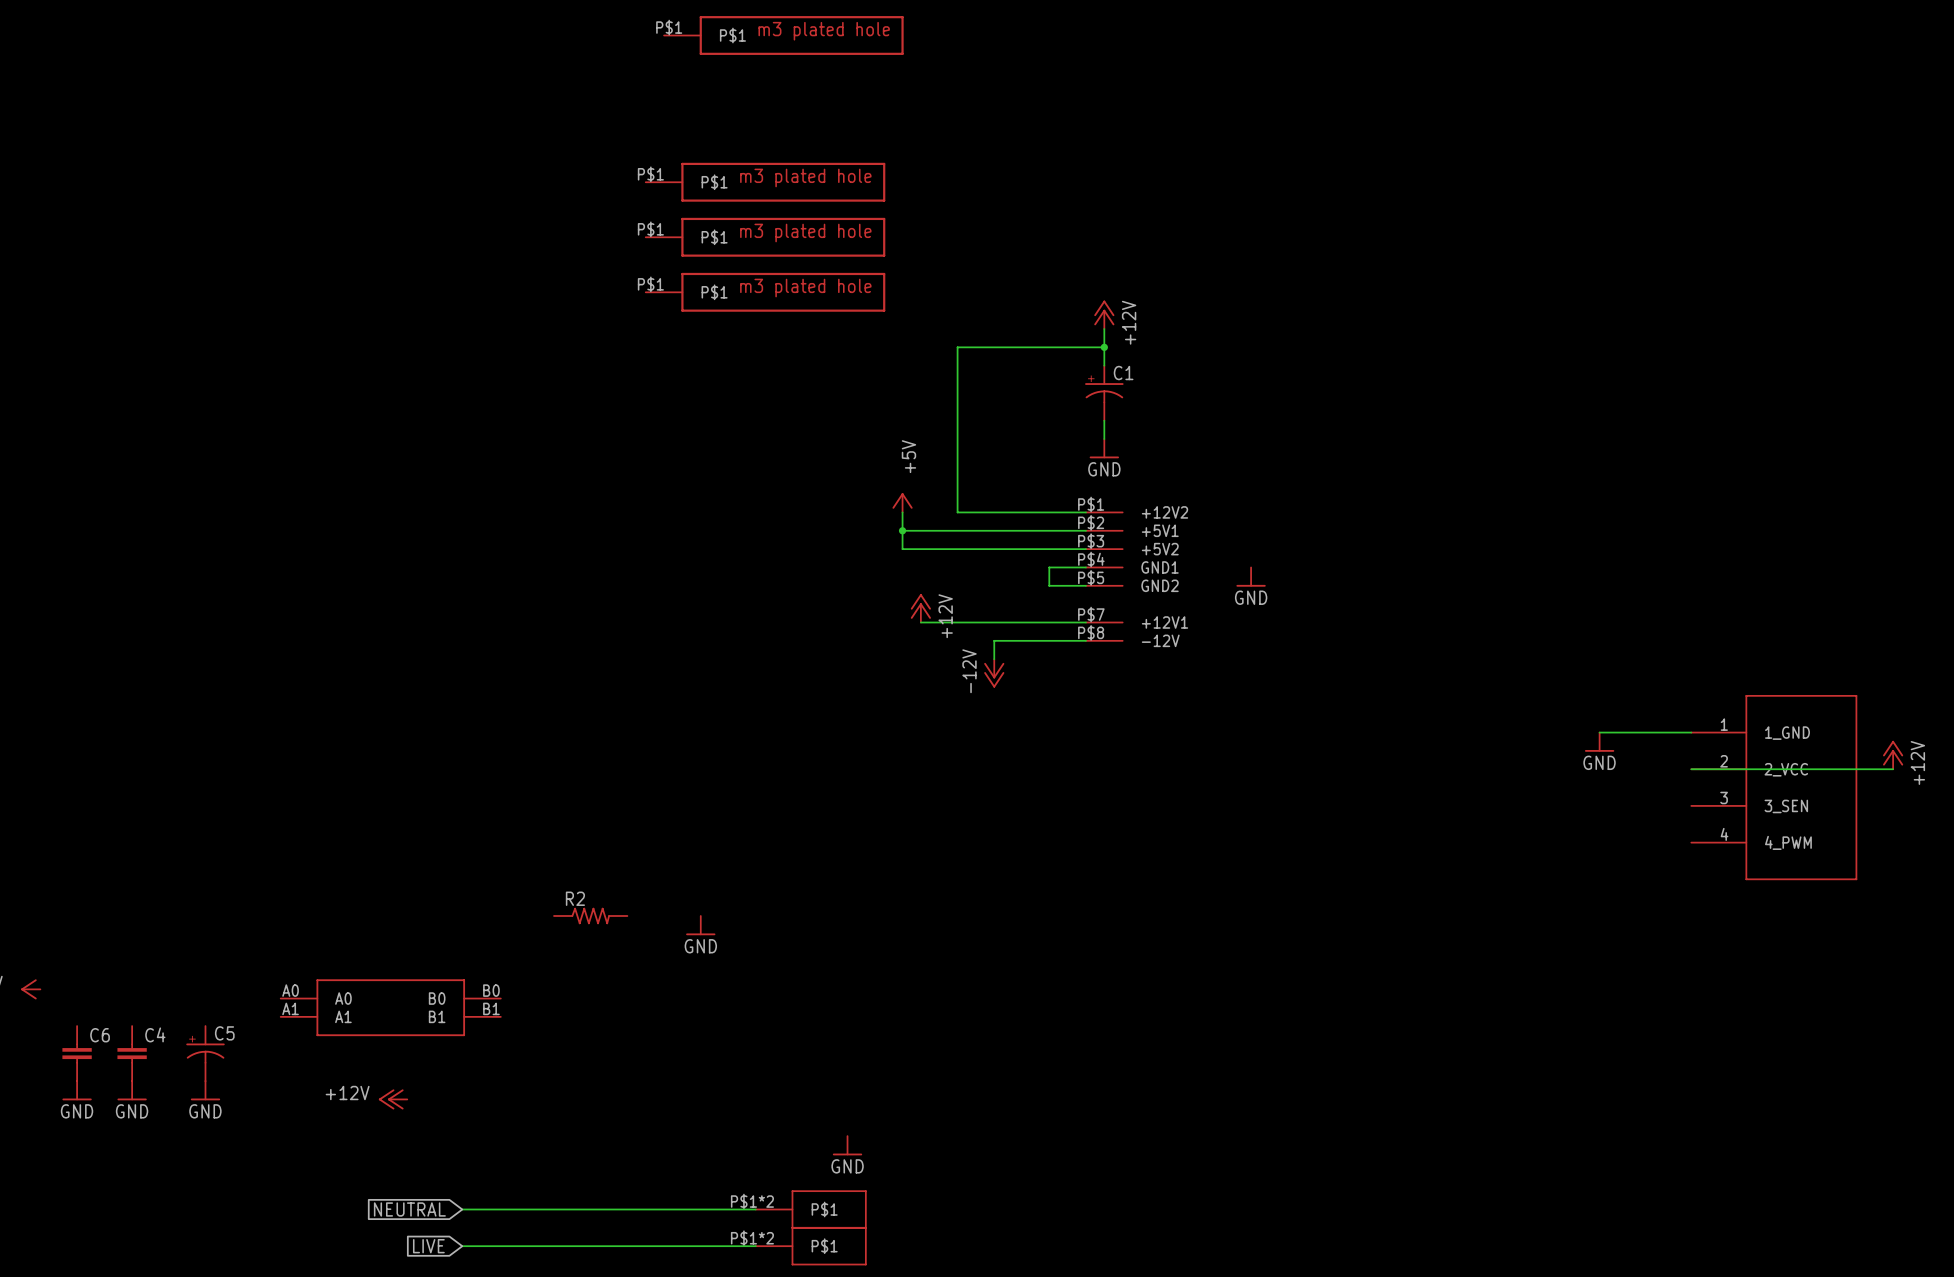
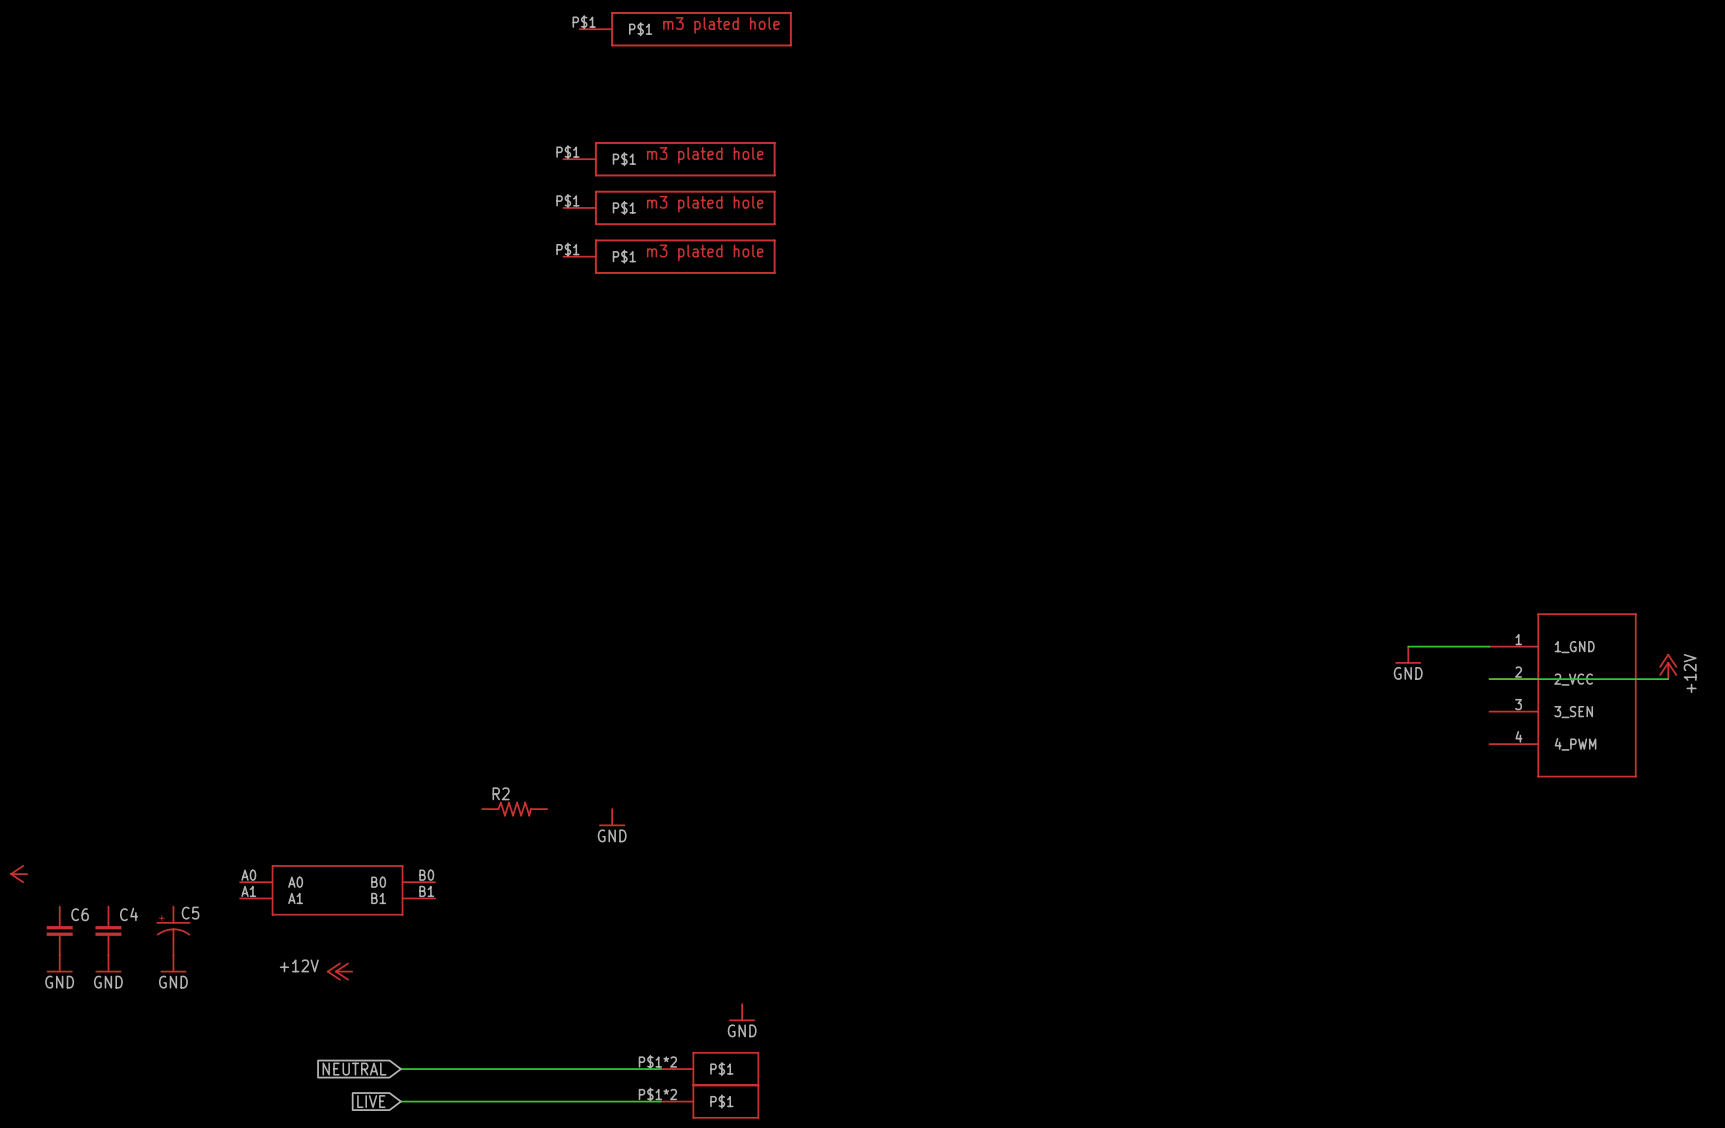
power symbol: +12V (1104, 314) -> none
wire: (1104, 329) (1104, 365) -> none
wire: (1104, 347) (957, 347) (957, 512) (1085, 512) -> none
junction: (1104, 347) -> none
C1: (1104, 393) -> none
wire: (1104, 420) (1104, 439) -> none
power symbol: GND (1104, 448) -> none
power symbol: +5V (902, 502) -> none
wire: (902, 512) (902, 549) (1085, 549) -> none
wire: (902, 530) (1085, 530) -> none
junction: (902, 530) -> none
wire: (1085, 567) (1049, 567) (1049, 585) (1085, 585) -> none
part: (1104, 576) -> none
power symbol: GND (1251, 577) -> none
power symbol: +12V (920, 608) -> none
wire: (920, 622) (1085, 622) -> none
wire: (1085, 640) (994, 640) (994, 659) -> none
power symbol: -12V (994, 673) -> none

